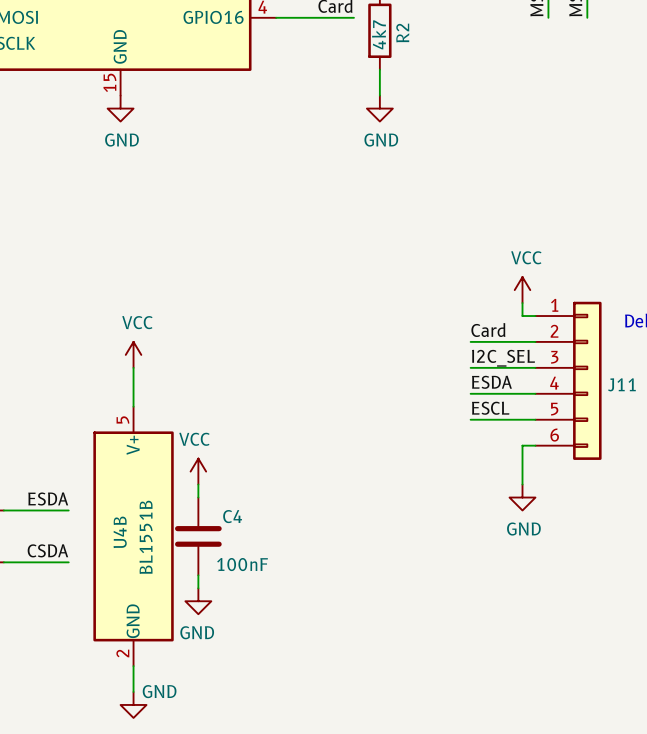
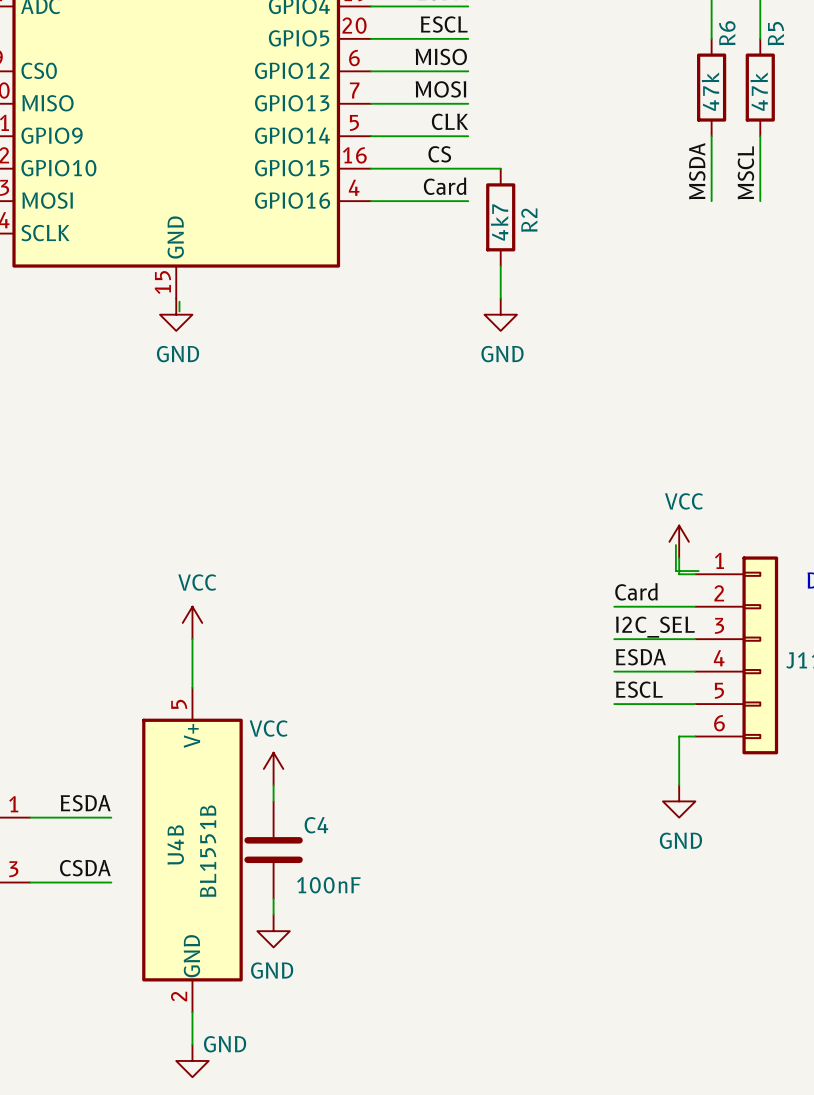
wire: none -> (179, 301) (179, 311)
wire: none -> (675, 545) (675, 571) (698, 571)

